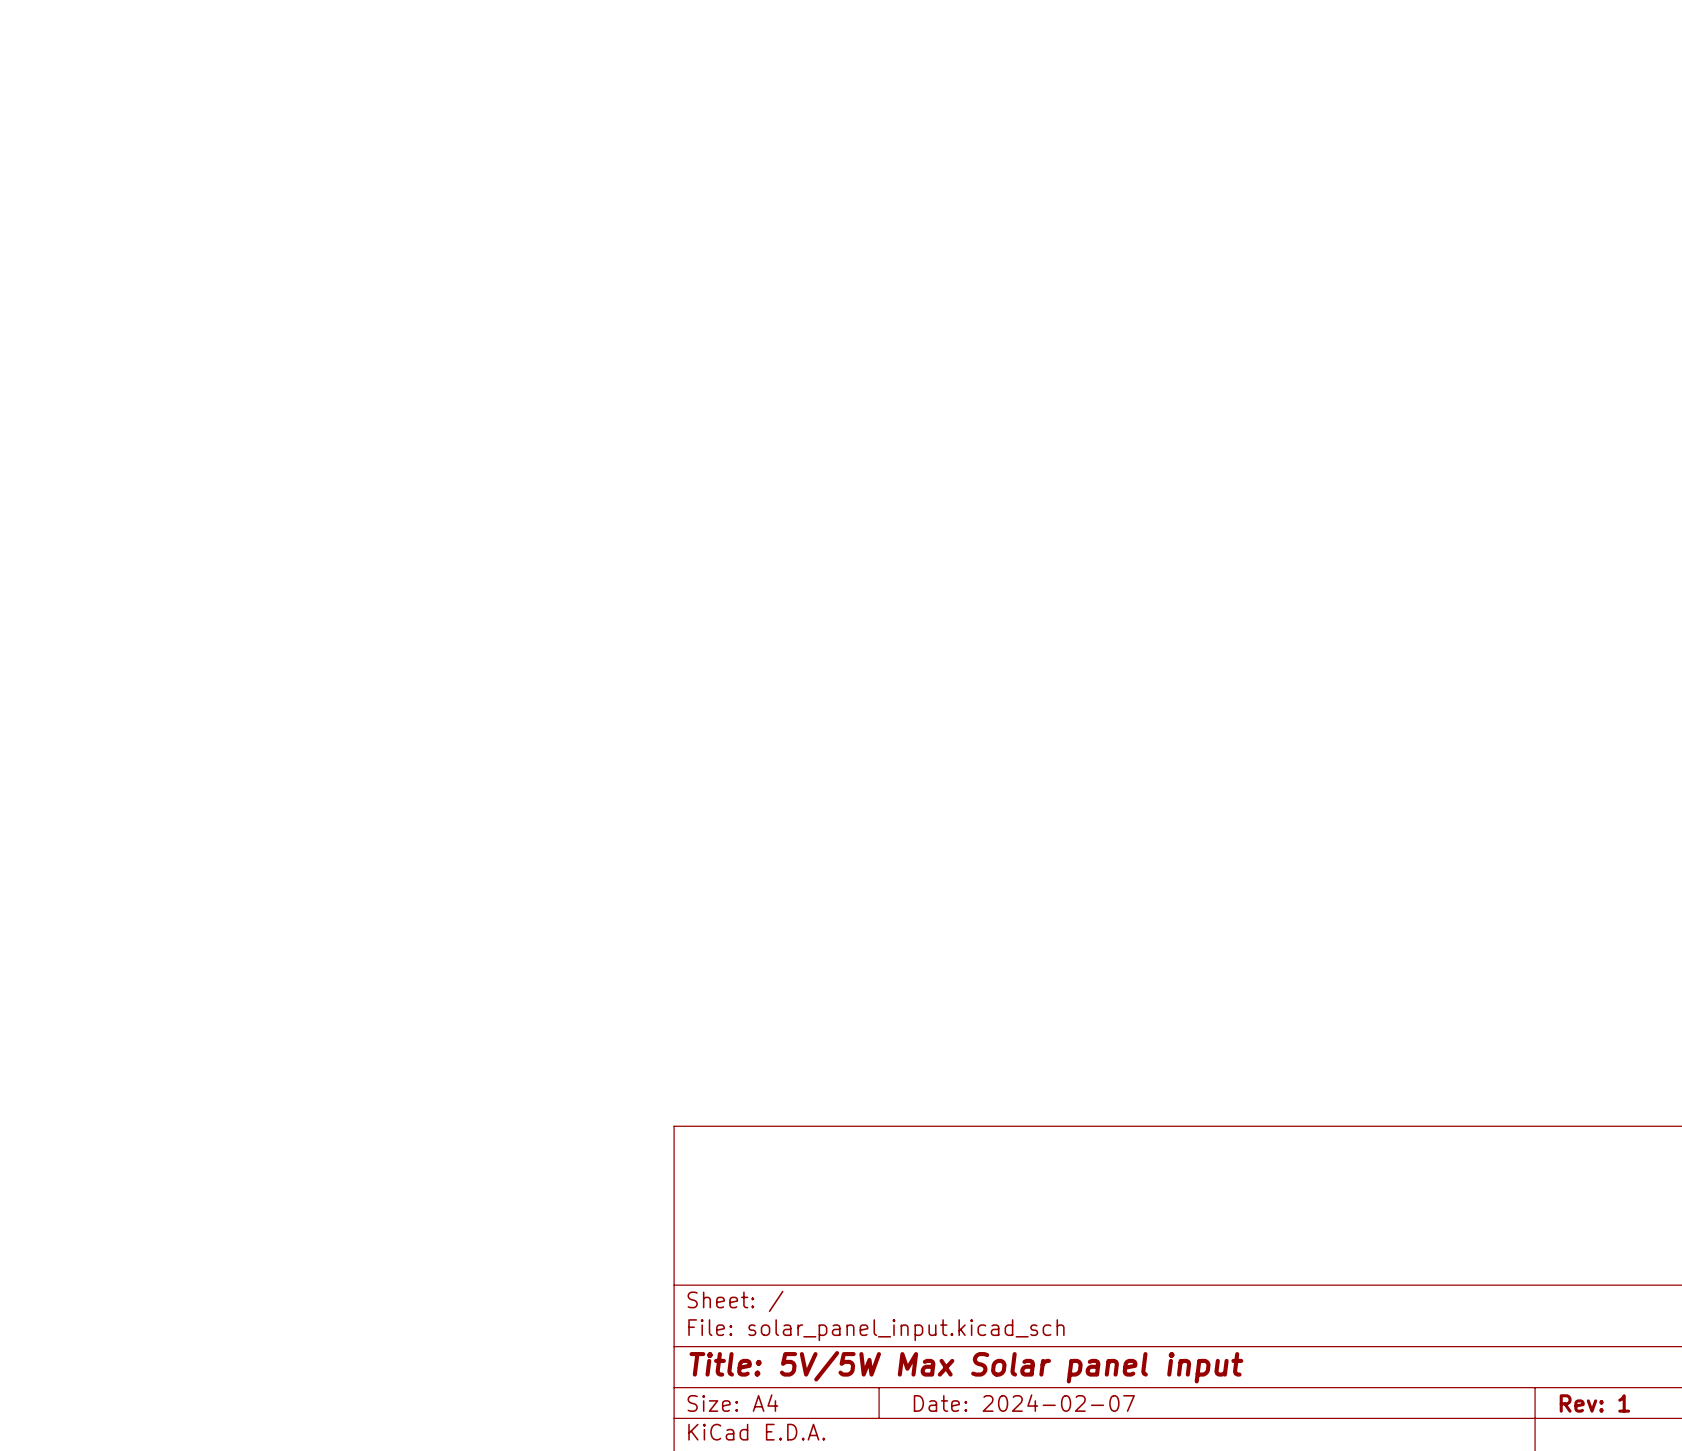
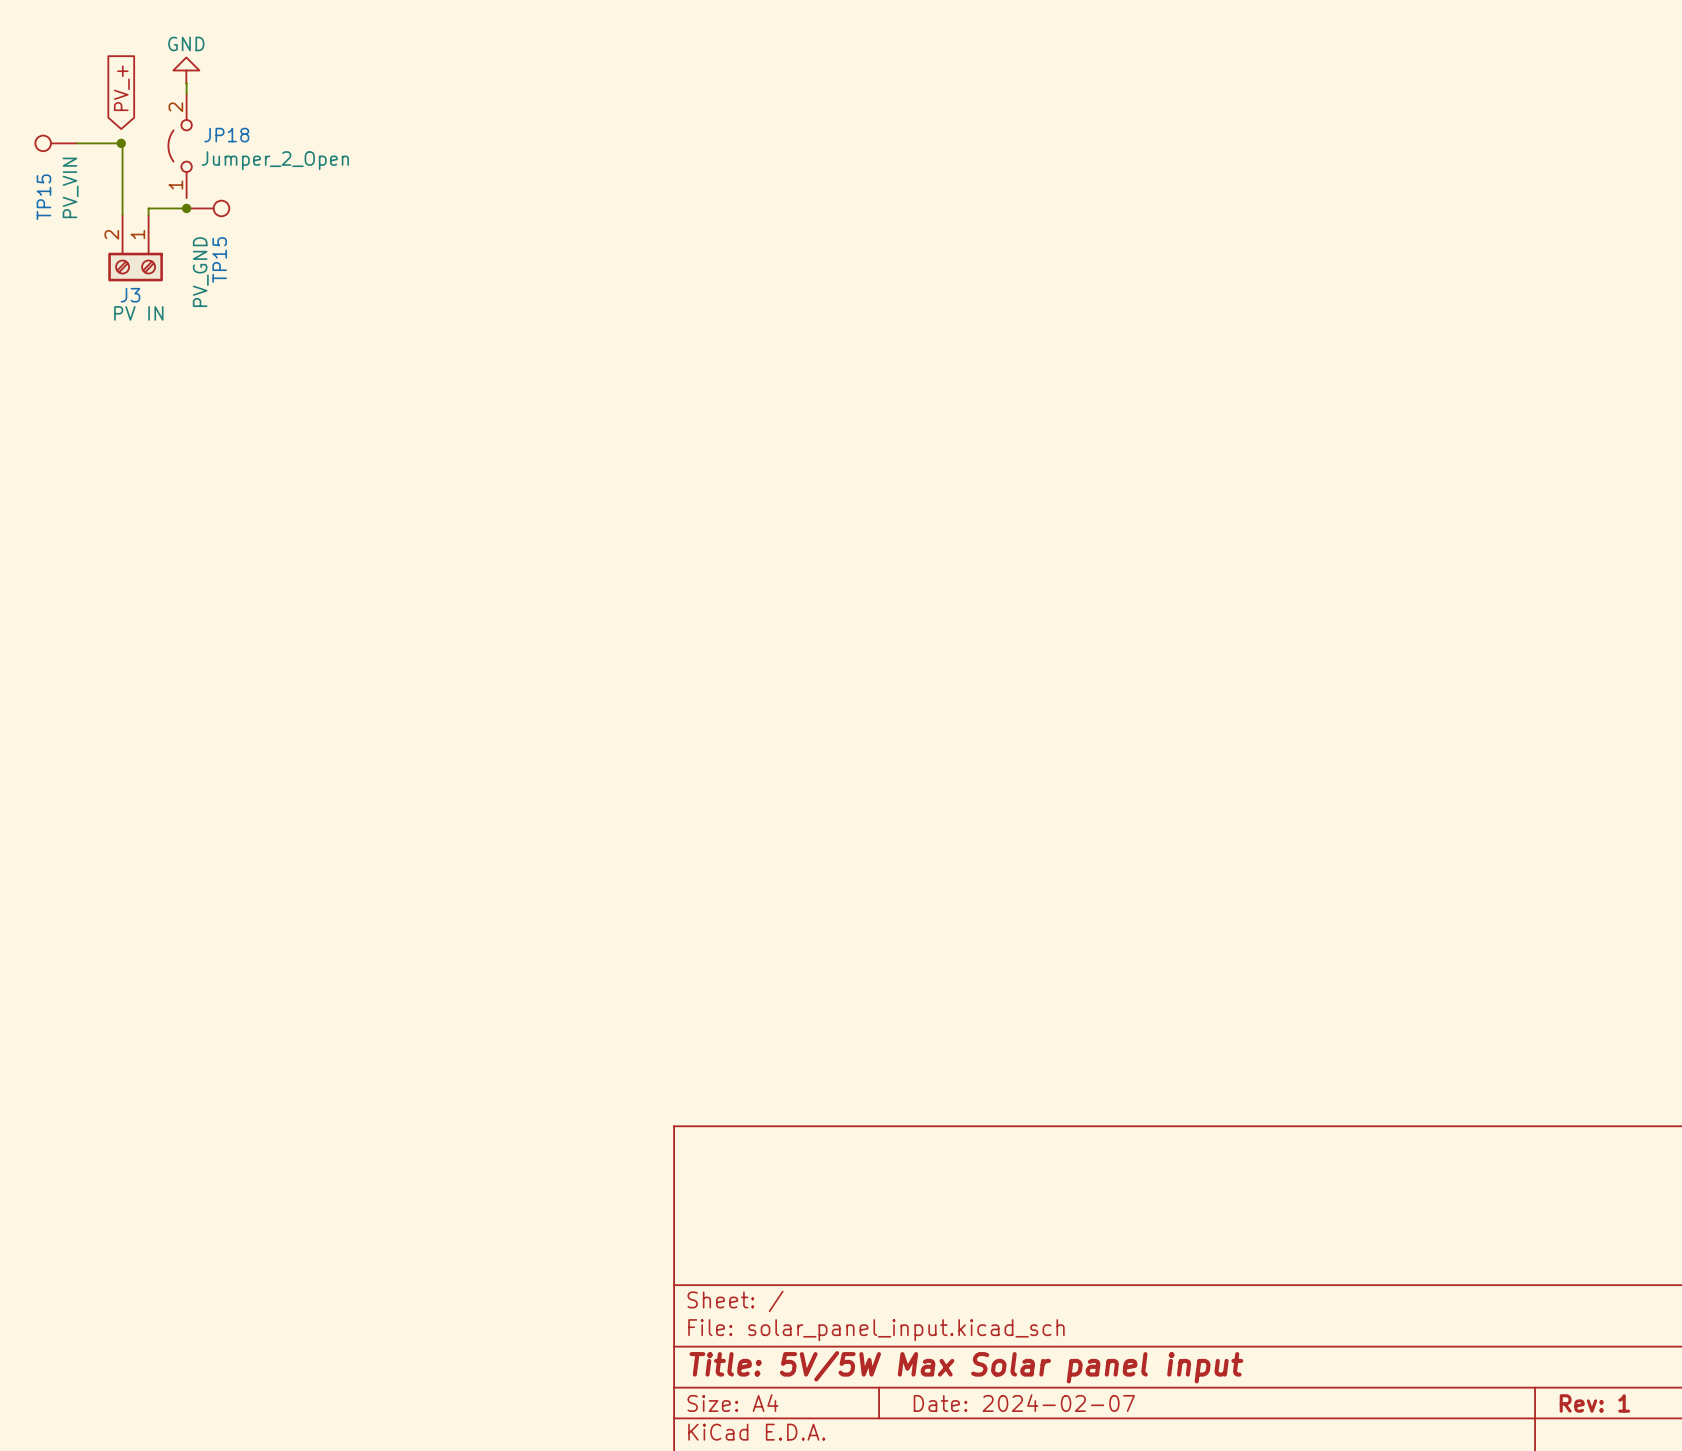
power symbol: none -> GND (186, 70)
wire: none -> (186, 83) (186, 93)
global label: none -> PV_+ (121, 88)
TP15: none -> PV_VIN (56, 143)
wire: none -> (76, 143) (122, 143) (122, 214)
junction: none -> (121, 143)
JP18: none -> Jumper_2_Open (180, 145)
junction: none -> (186, 208)
wire: none -> (187, 208) (148, 208) (148, 214)
TP15: none -> PV_GND (208, 208)
J3: none -> PV IN (135, 248)

